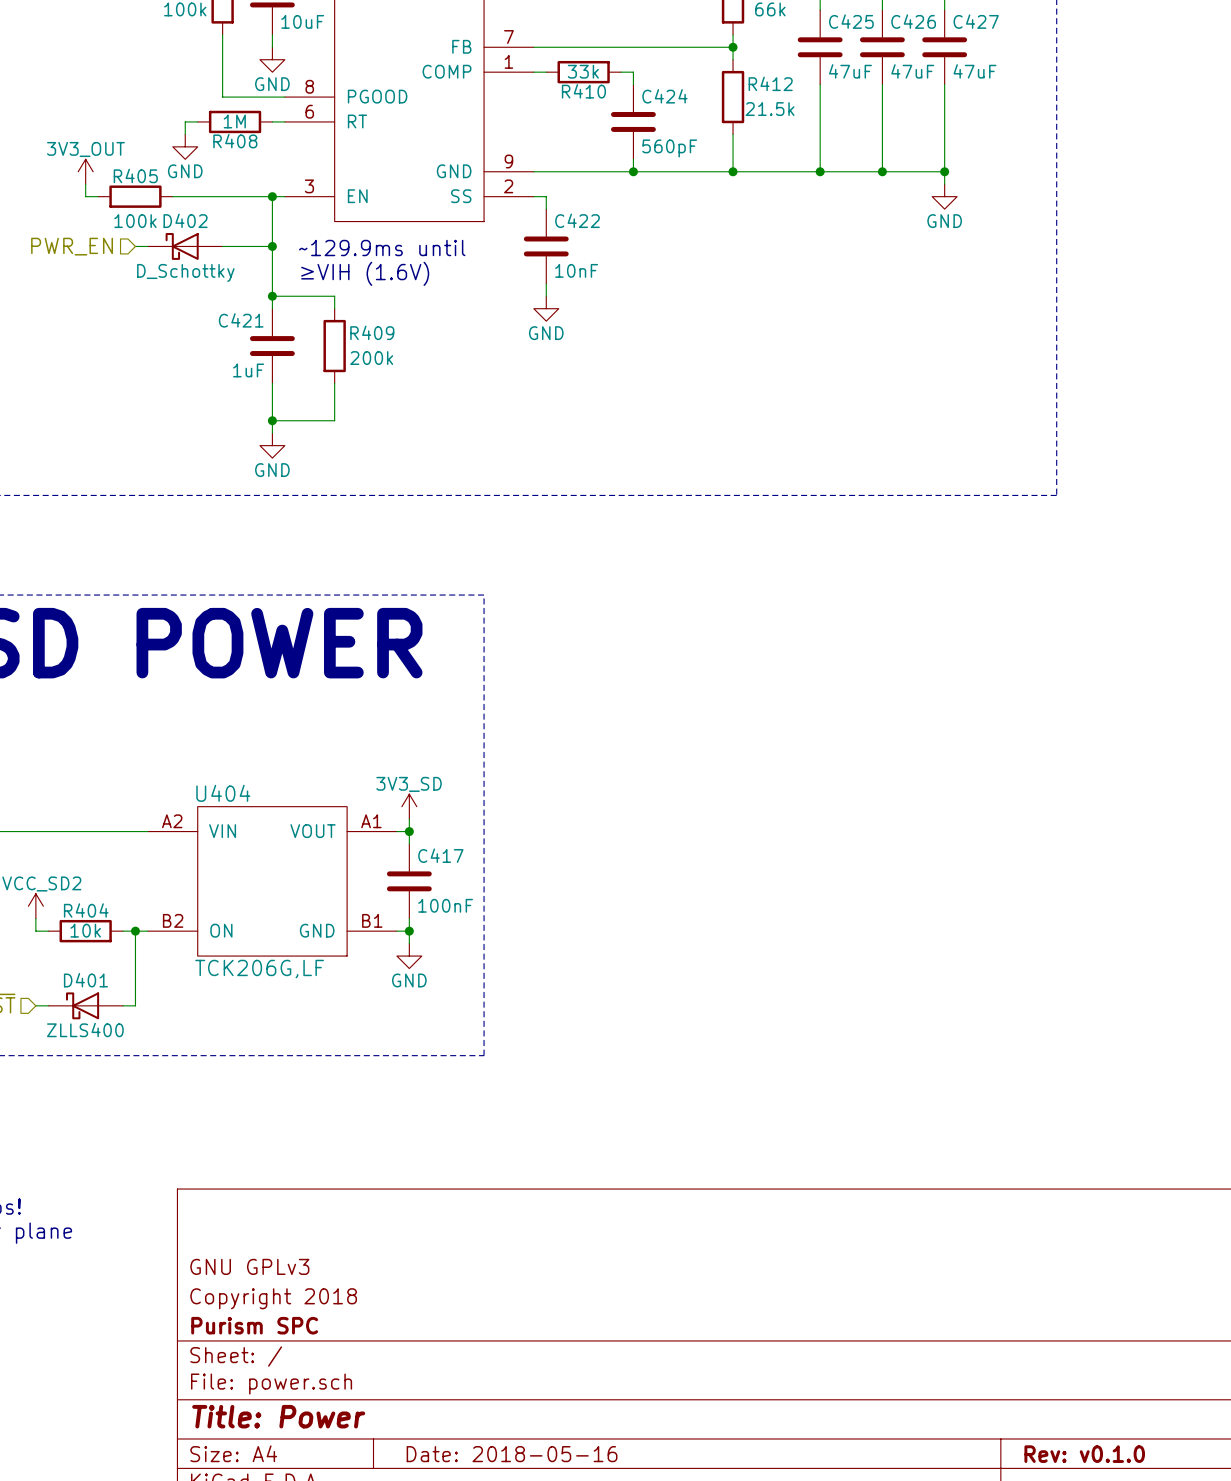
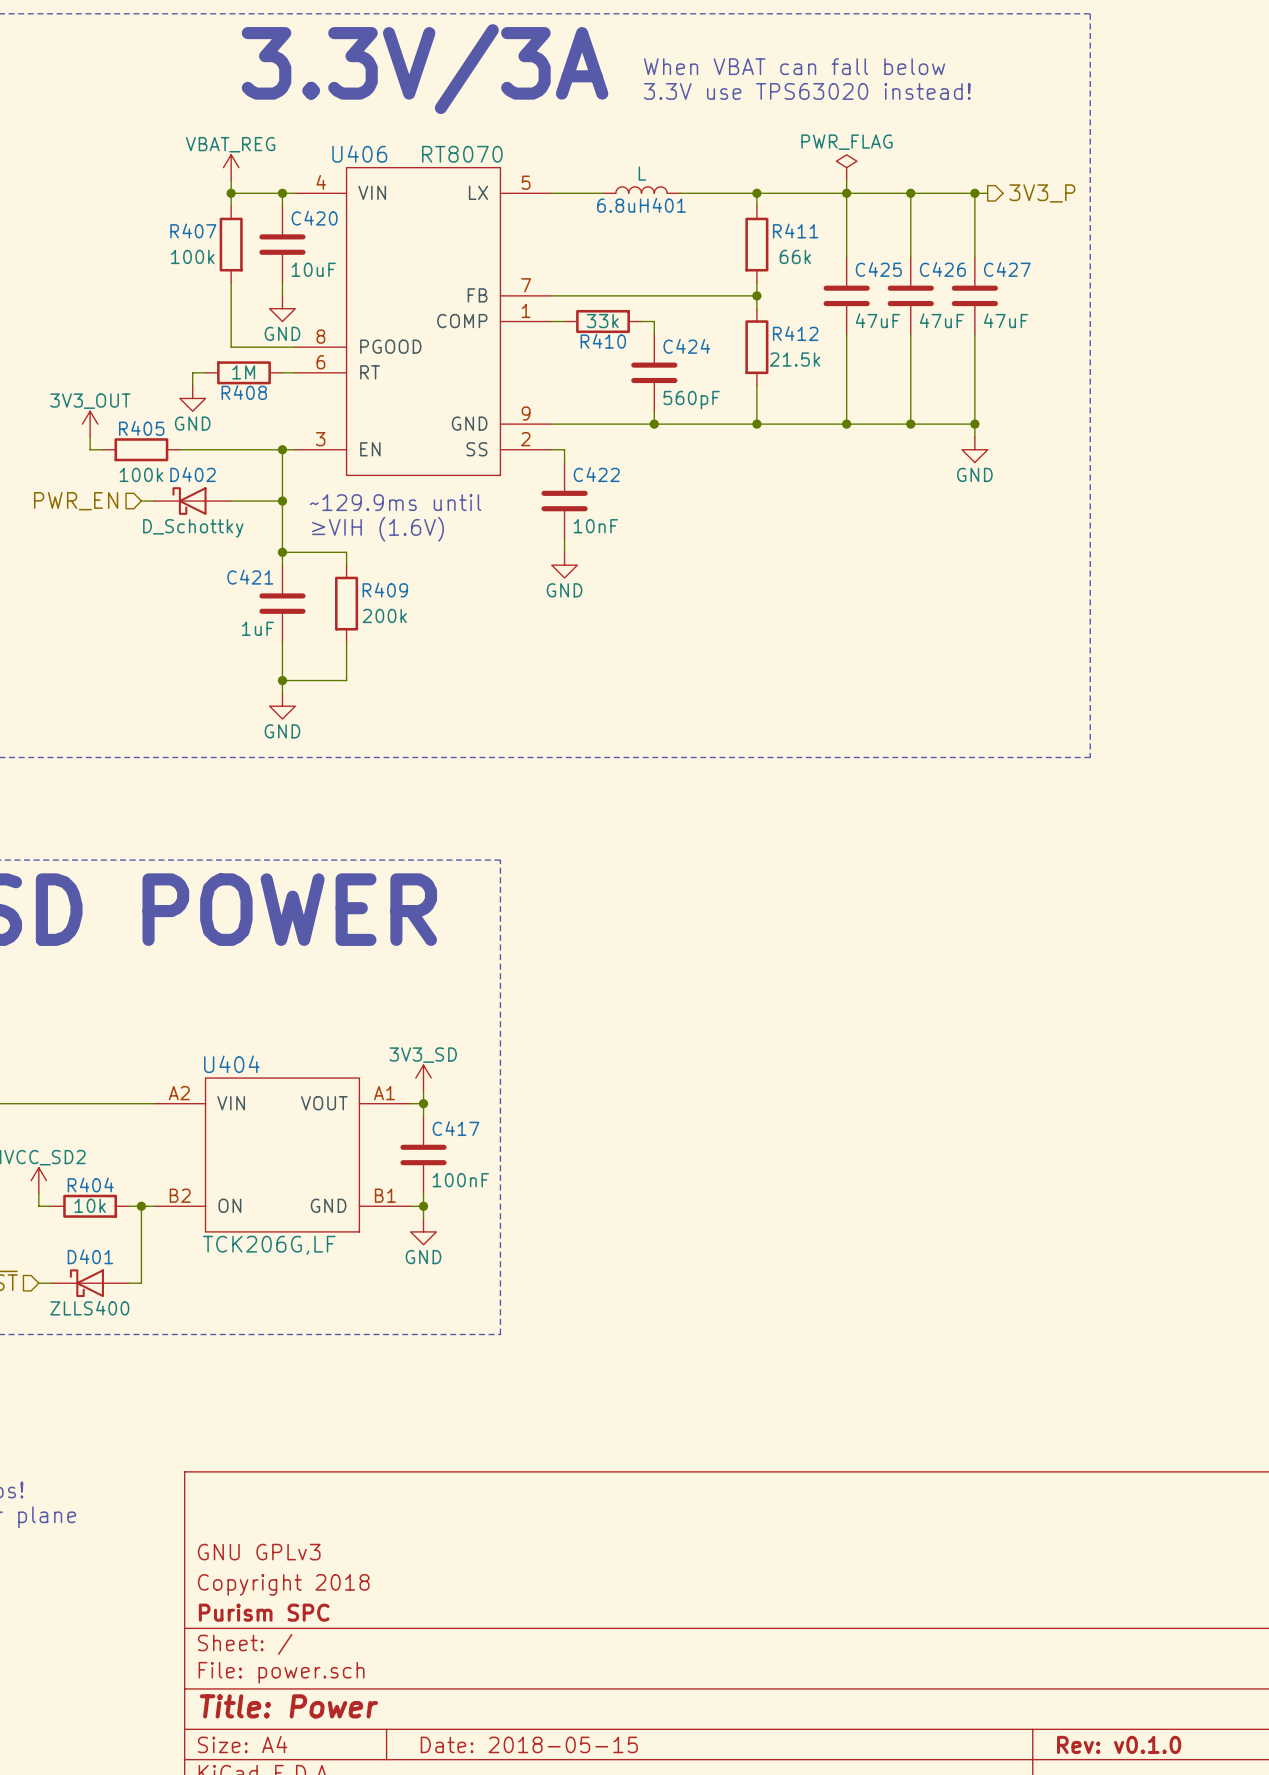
title block: Date: 2018-05-16 (512, 1454) -> Date: 2018-05-15 (529, 1744)

